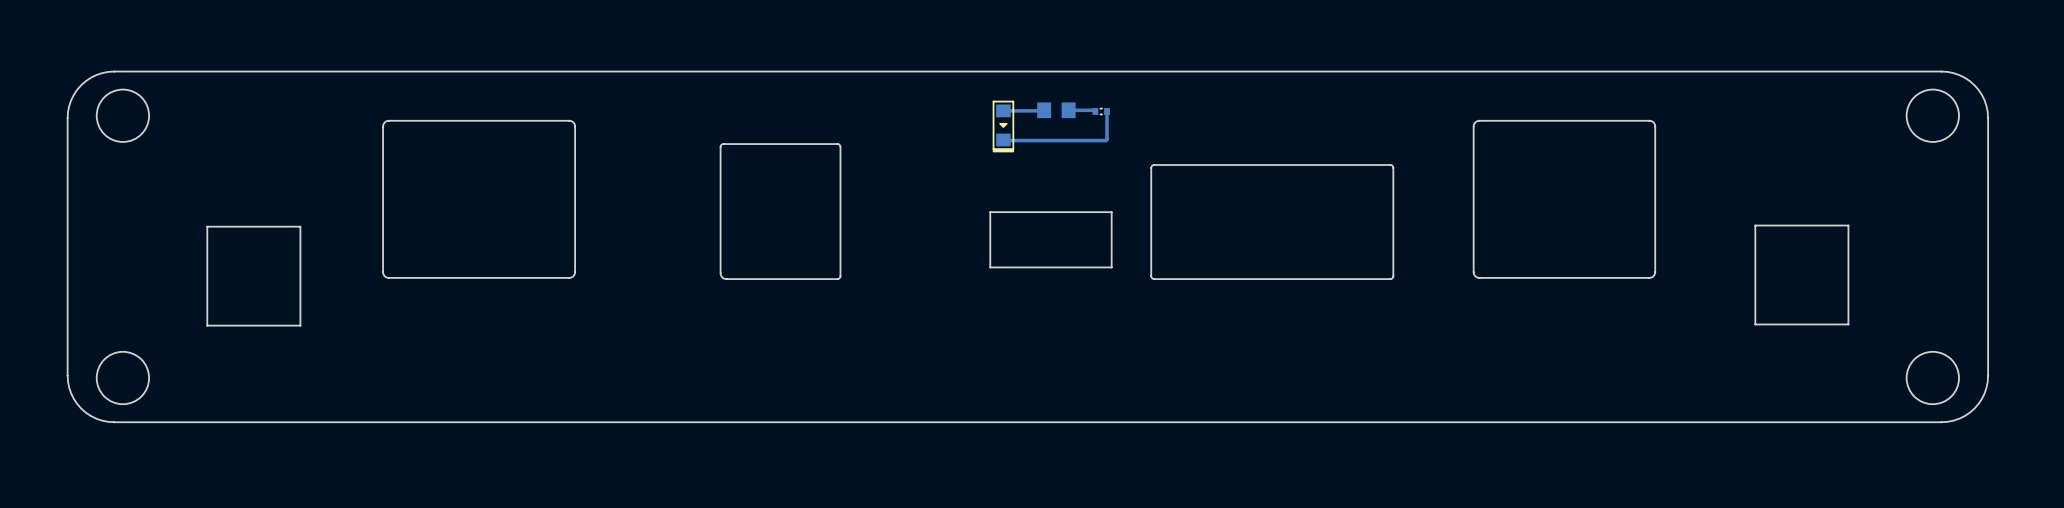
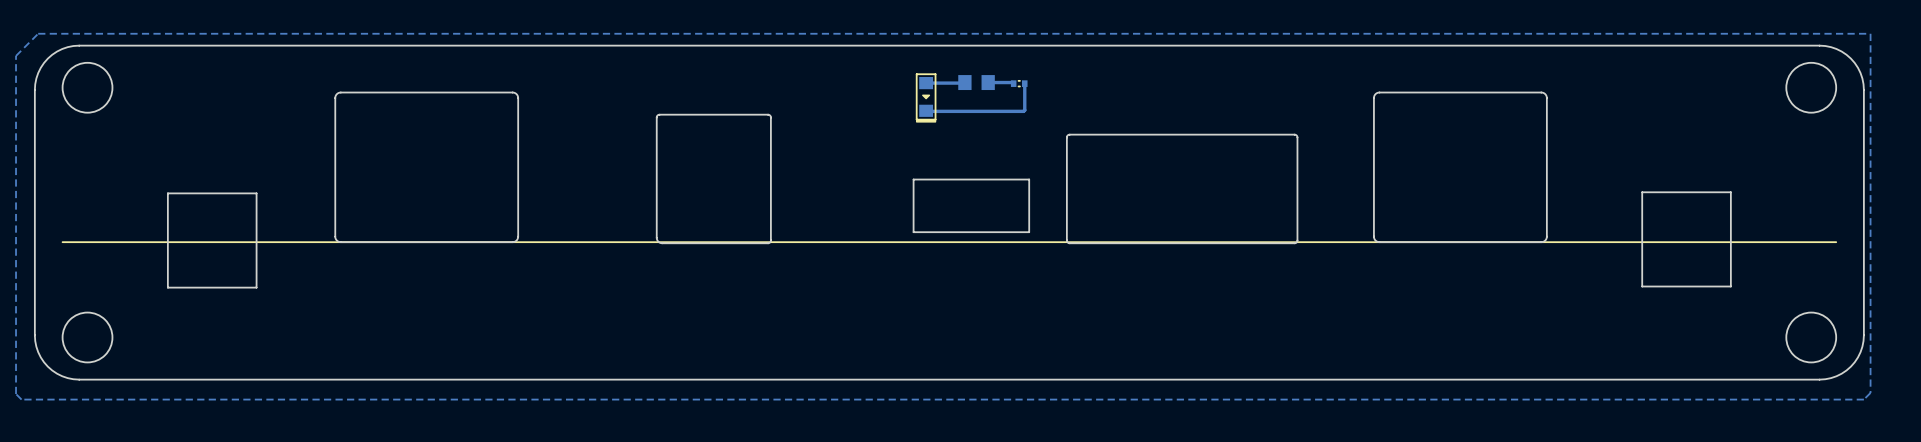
zone outline: none -> (1870, 33) (1870, 392) (1863, 399) (21, 399) (16, 394) (16, 55) (38, 33) (1870, 33)
line: none -> (1836, 242) (62, 242)

